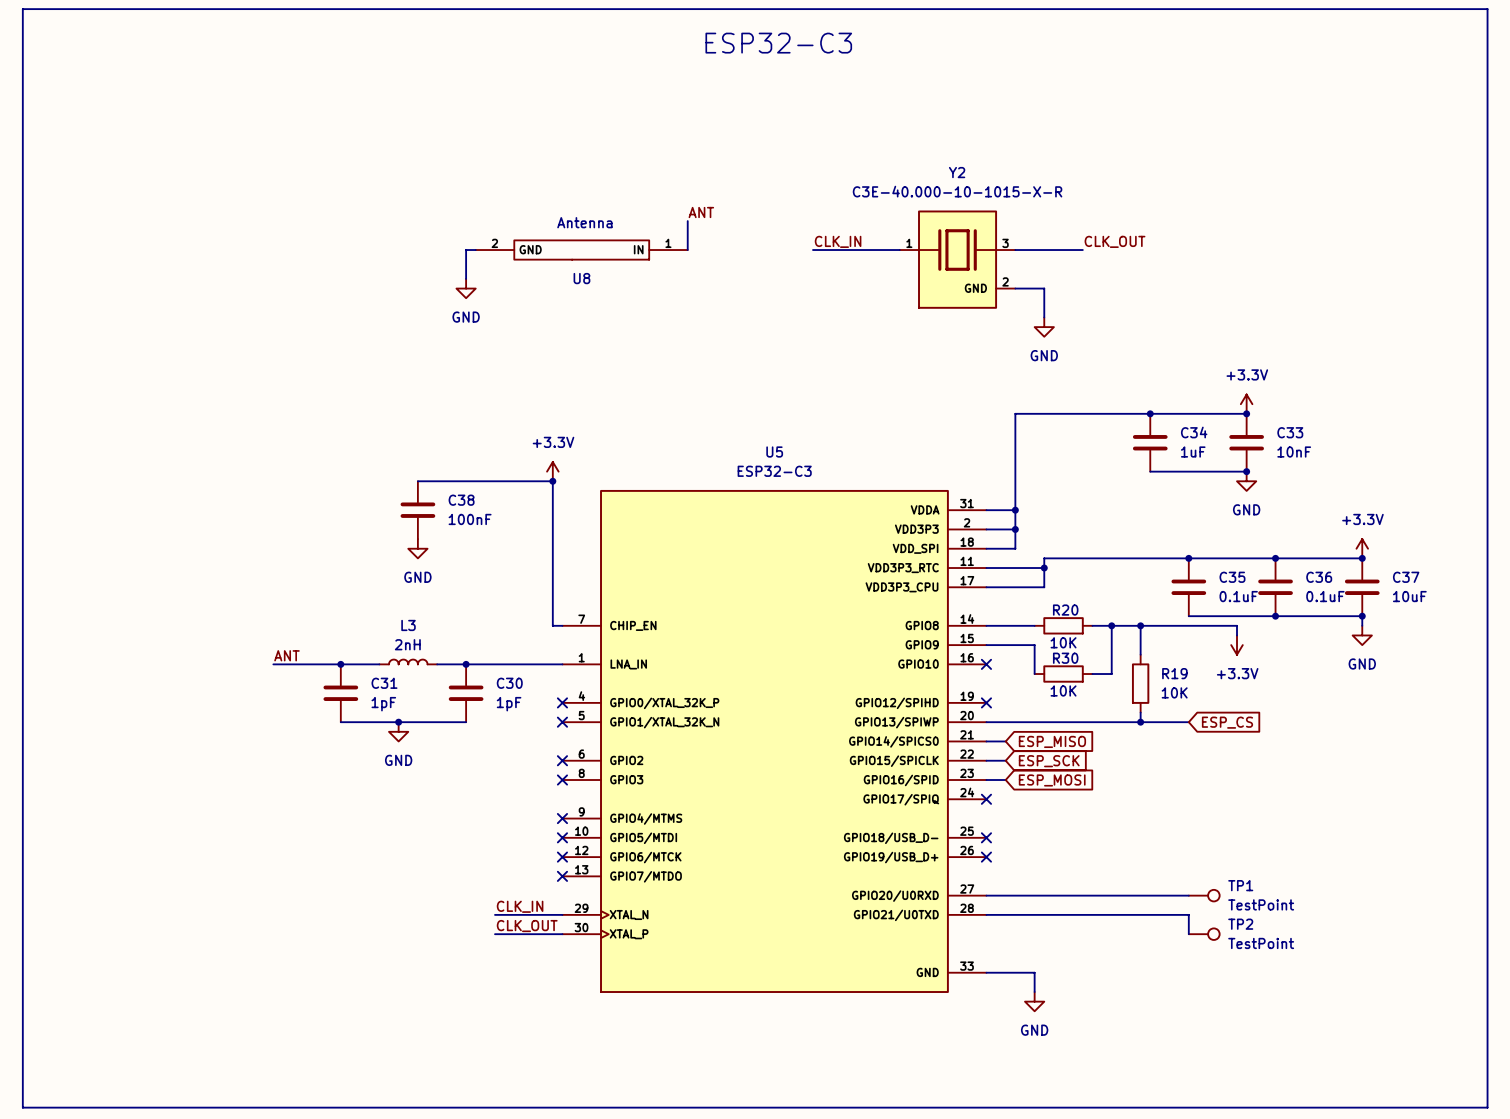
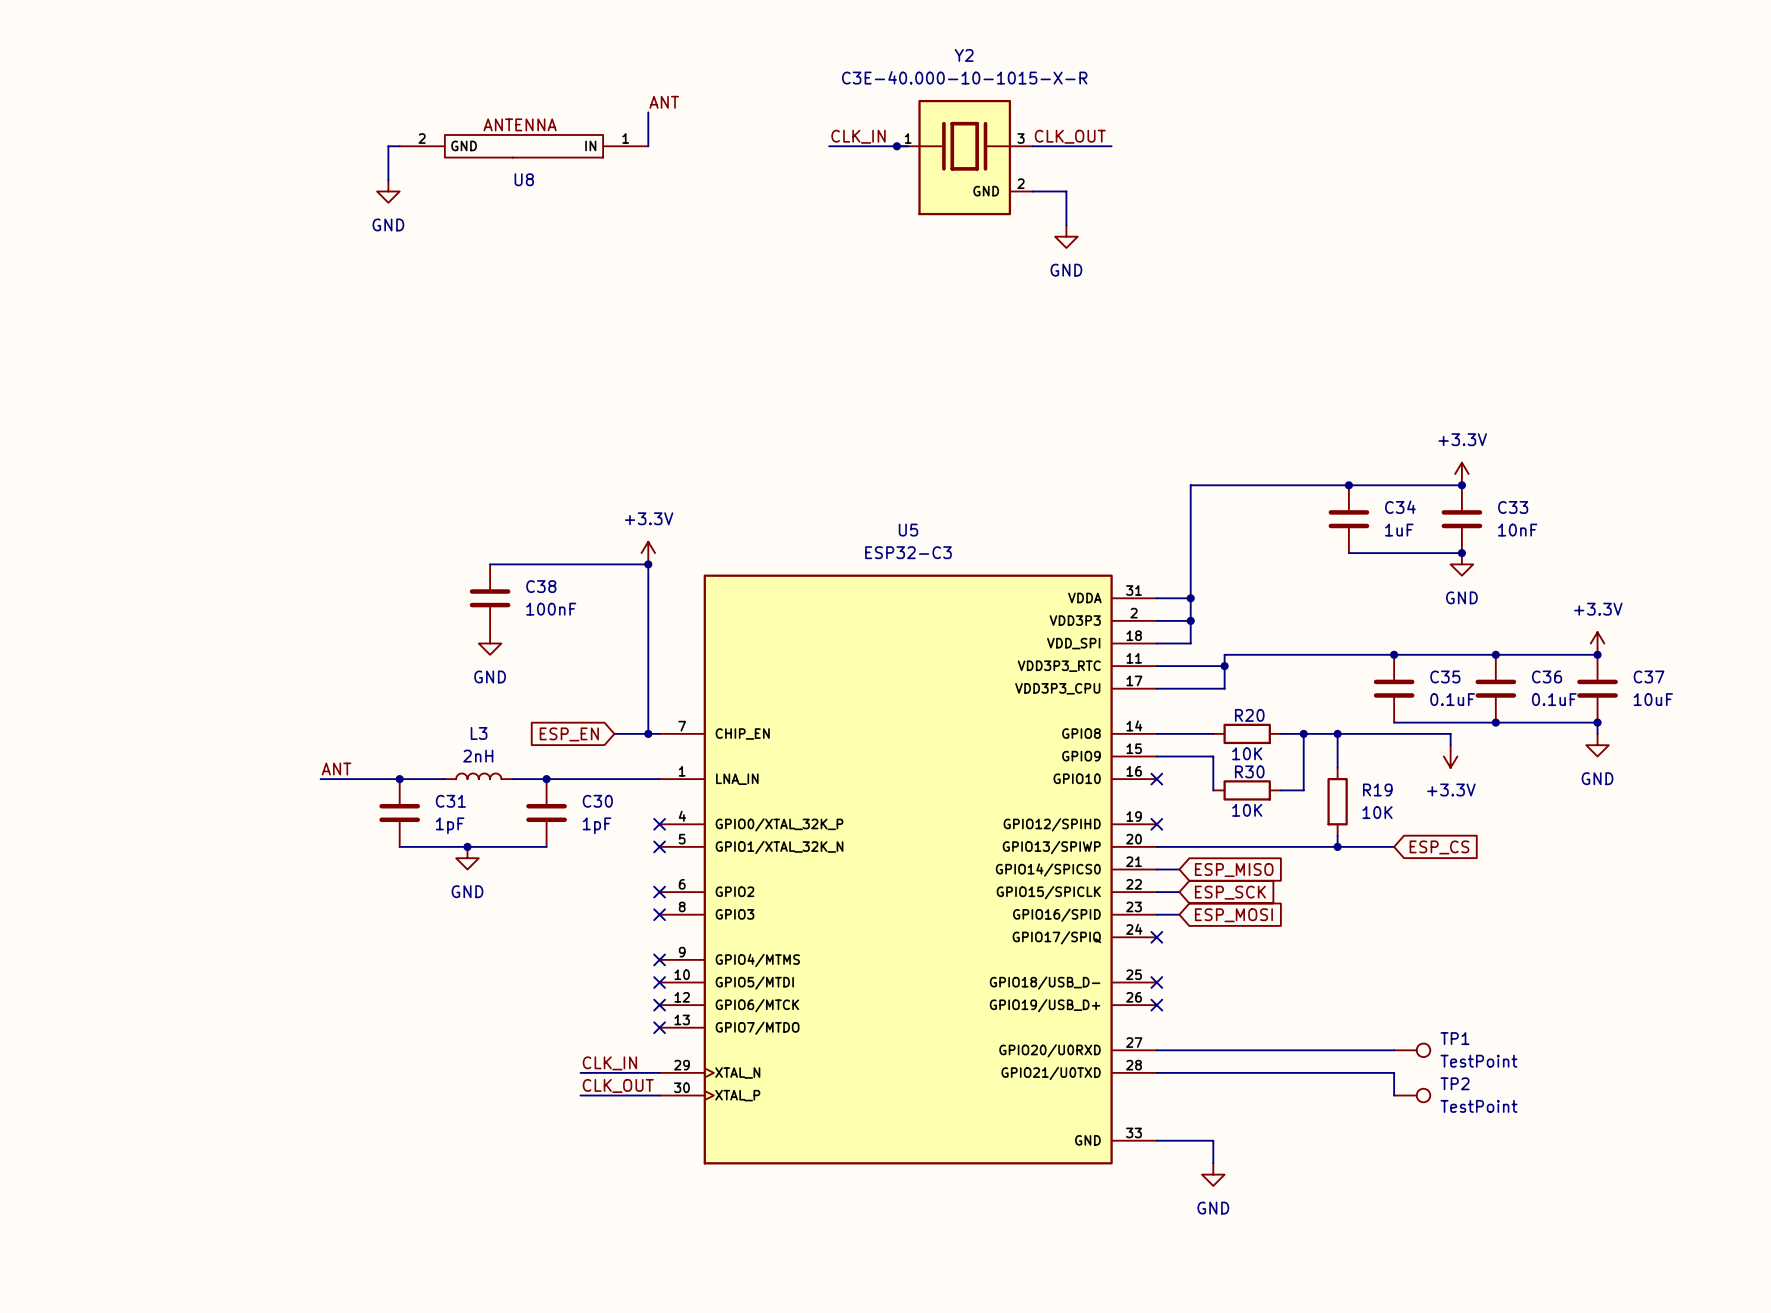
line: (22, 9) (1487, 9) (1487, 1107) (22, 1107) (22, 9) -> none
text: ESP32-C3 (778, 43) -> none
label: none -> ANTENNA (520, 124)
label: none -> CLK_OUT (1070, 136)
wire: none -> (829, 146) (908, 146)
junction: none -> (896, 146)
label position: ANT (701, 212) -> ANT (664, 102)
wire: (687, 221) (687, 250) -> (648, 112) (648, 146)
text: Antenna (584, 222) -> none
label position: CLK_IN (838, 241) -> CLK_IN (858, 136)
label: CLK_OUT (1115, 241) -> none
wire: (475, 250) (466, 250) (466, 278) -> (399, 146) (388, 146) (388, 180)
U8 position: (581, 250) -> (523, 146)
wire: (813, 250) (899, 250) -> none
wire: (1015, 250) (1082, 250) -> (1032, 146) (1111, 146)
Y2 position: (957, 259) -> (964, 157)
power symbol position: GND (466, 288) -> GND (388, 191)
wire: (1015, 288) (1044, 288) (1044, 317) -> (1032, 191) (1066, 191) (1066, 225)
power symbol position: GND (1044, 327) -> GND (1066, 236)
wire: none -> (614, 733) (648, 733)
junction: none -> (648, 733)
global label: none -> ESP_EN (569, 734)

